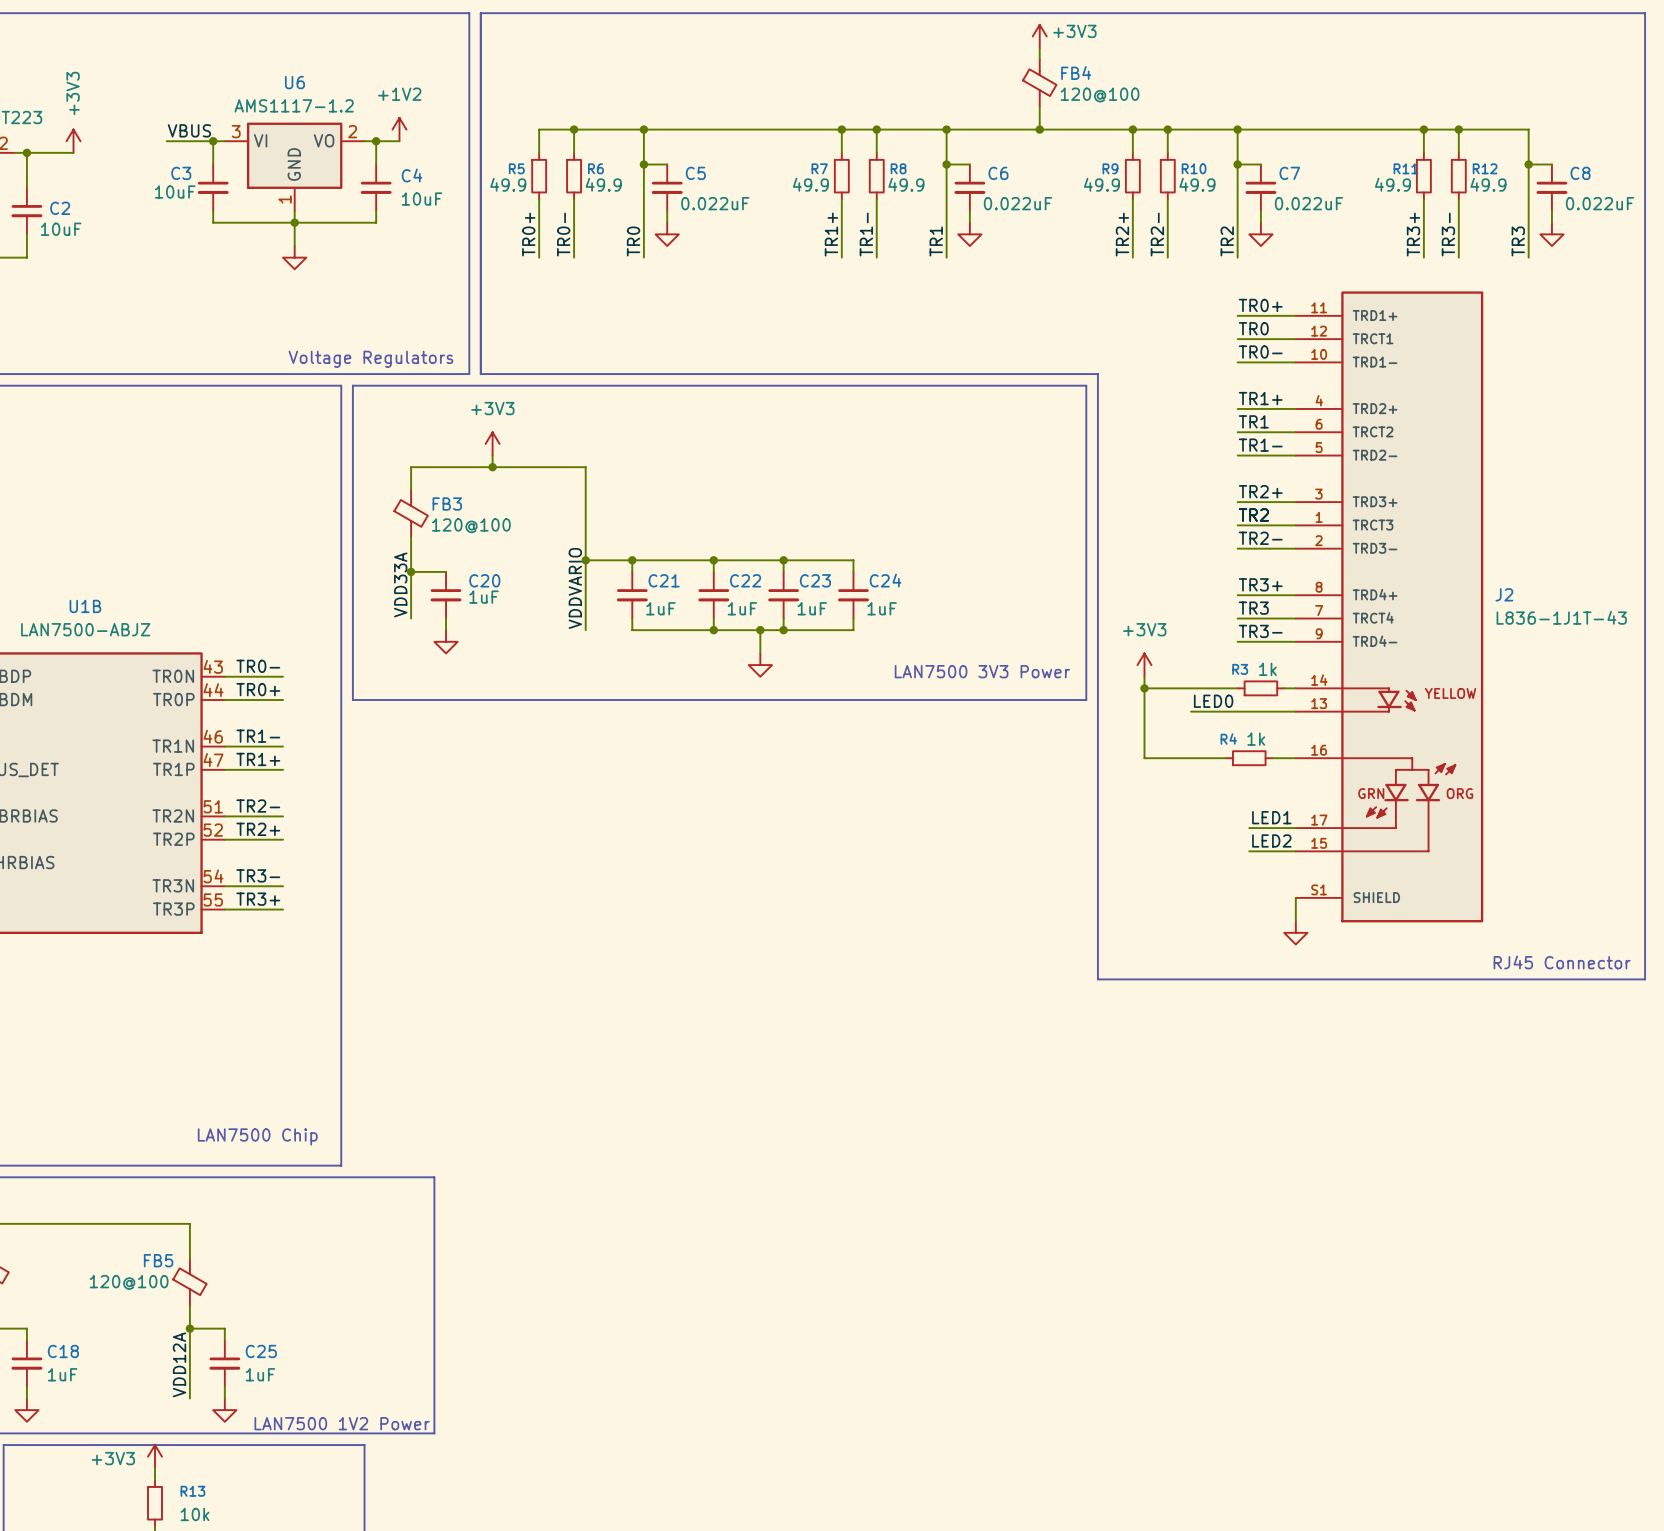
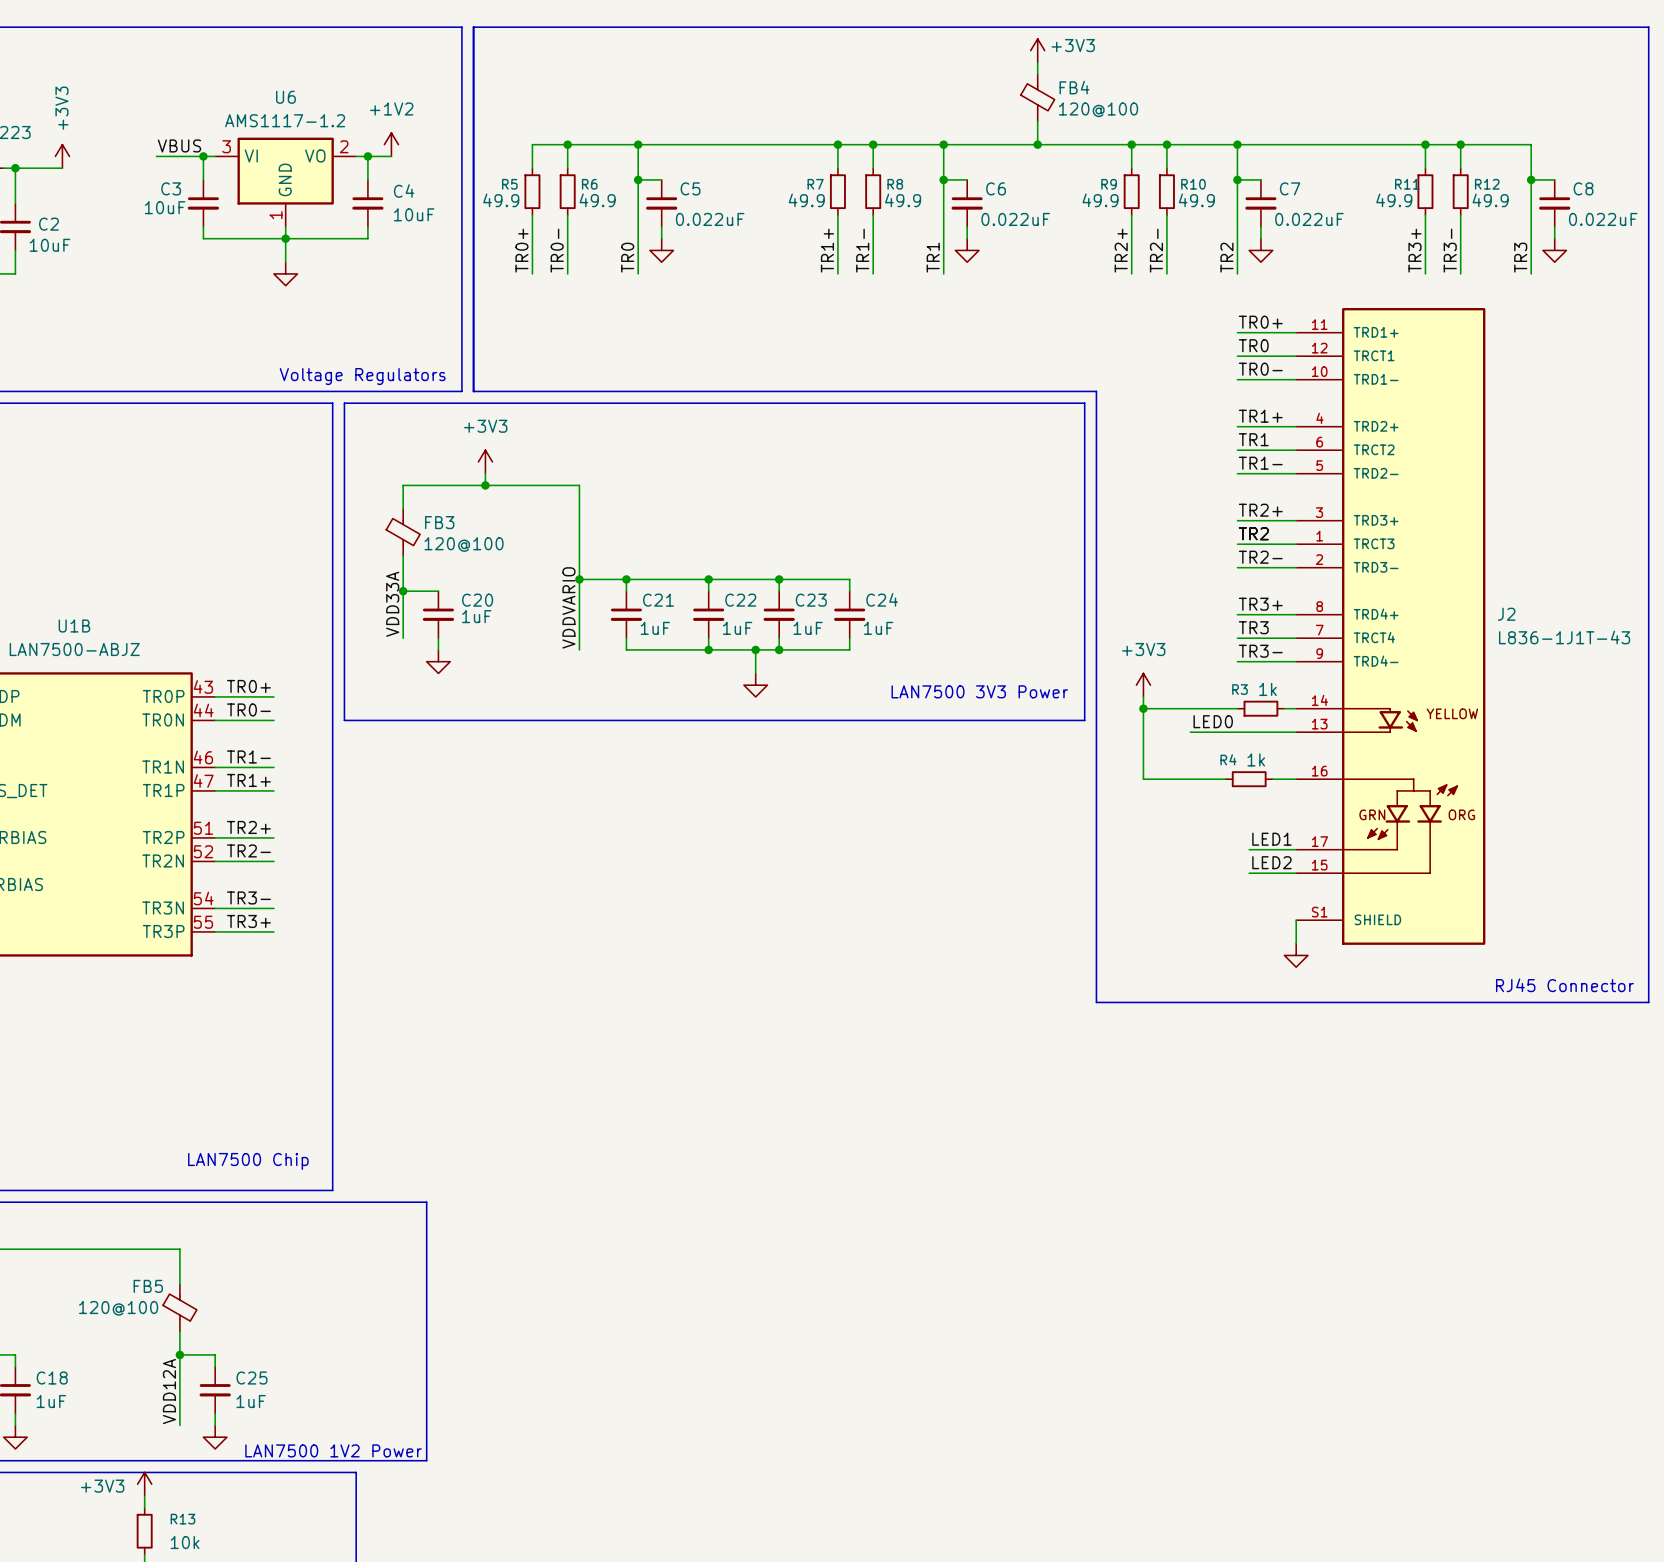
label: TR0- (258, 666) -> TR0+ (248, 686)
U1B pin name: TR0N (173, 676) -> TR0P (163, 696)
label: TR0+ (258, 689) -> TR0- (248, 709)
U1B pin name: TR0P (173, 699) -> TR0N (163, 720)
label: TR2- (258, 806) -> TR2+ (248, 827)
U1B pin name: TR2N (173, 815) -> TR2P (163, 837)
label: TR2+ (258, 829) -> TR2- (248, 850)
U1B pin name: TR2P (173, 839) -> TR2N (163, 861)

